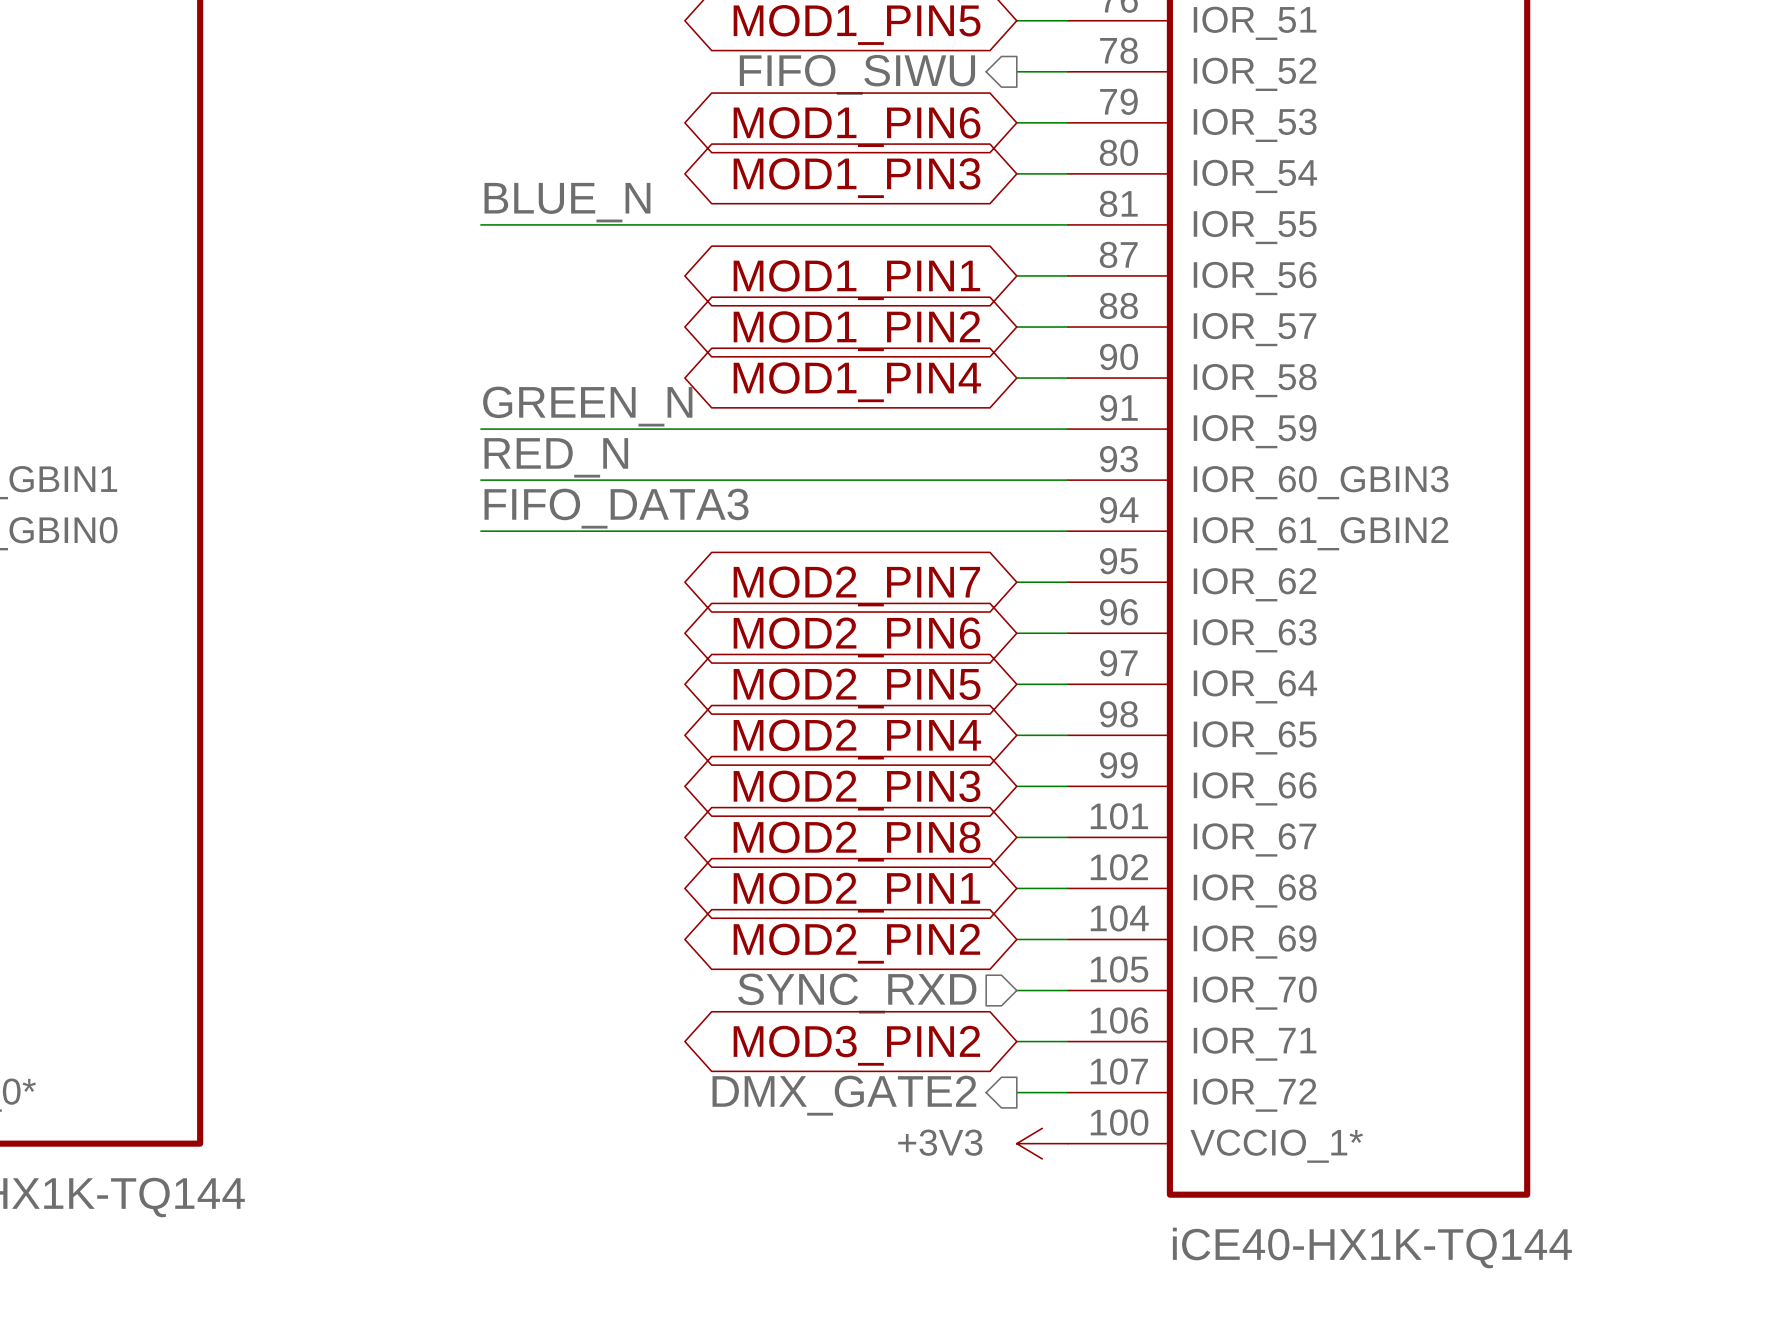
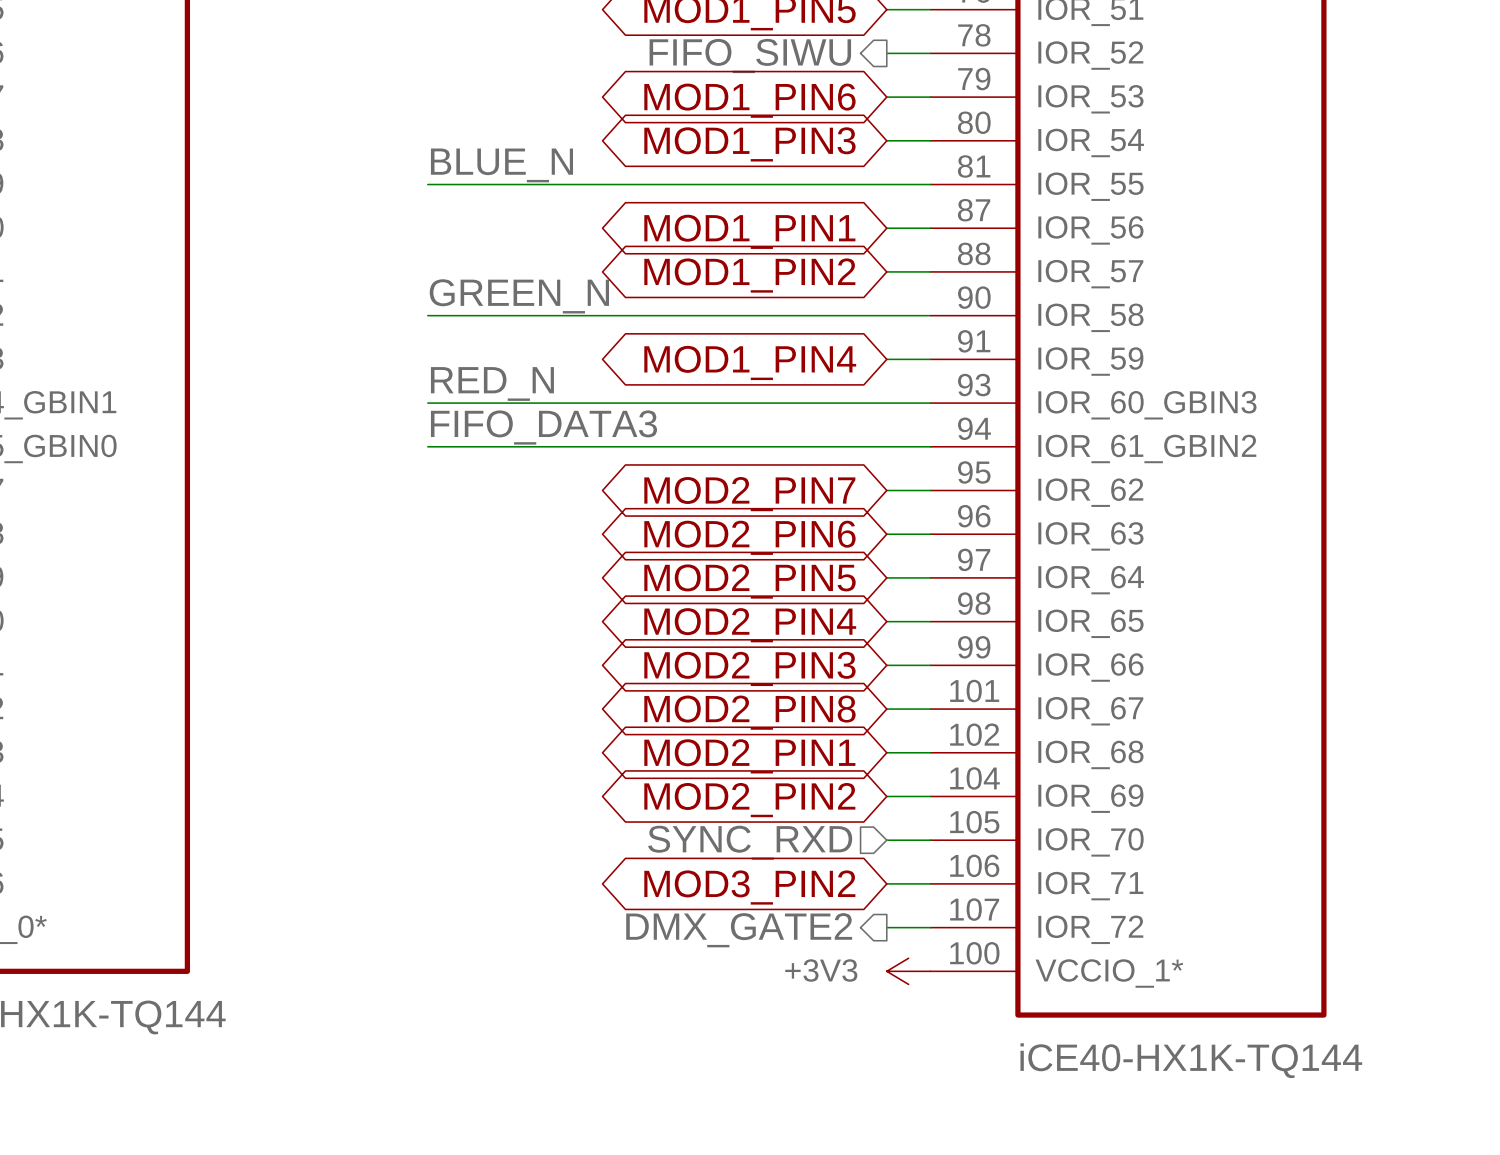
global label position: MOD1_PIN4 (857, 382) -> MOD1_PIN4 (750, 362)
label position: GREEN_N (587, 406) -> GREEN_N (519, 296)
wire: (480, 429) (1016, 429) -> (427, 315) (886, 315)

